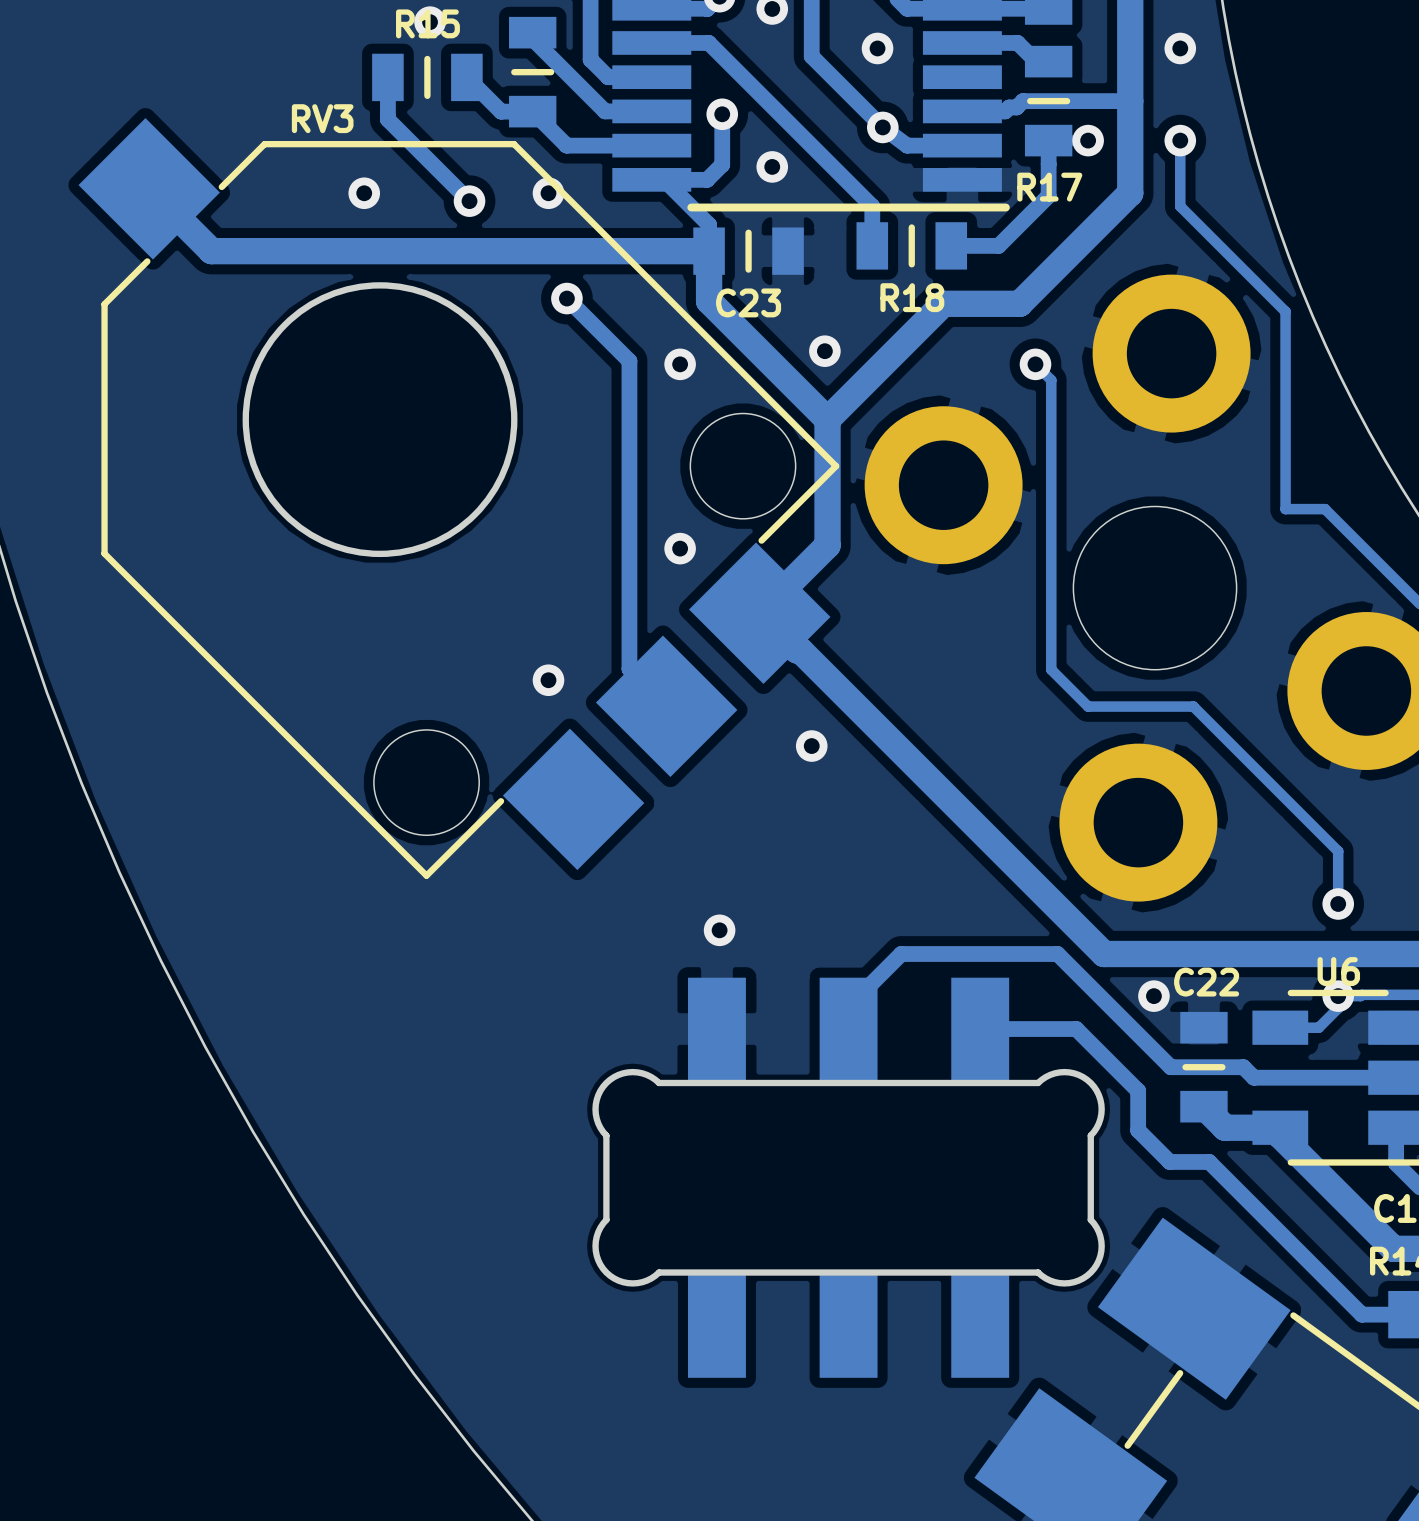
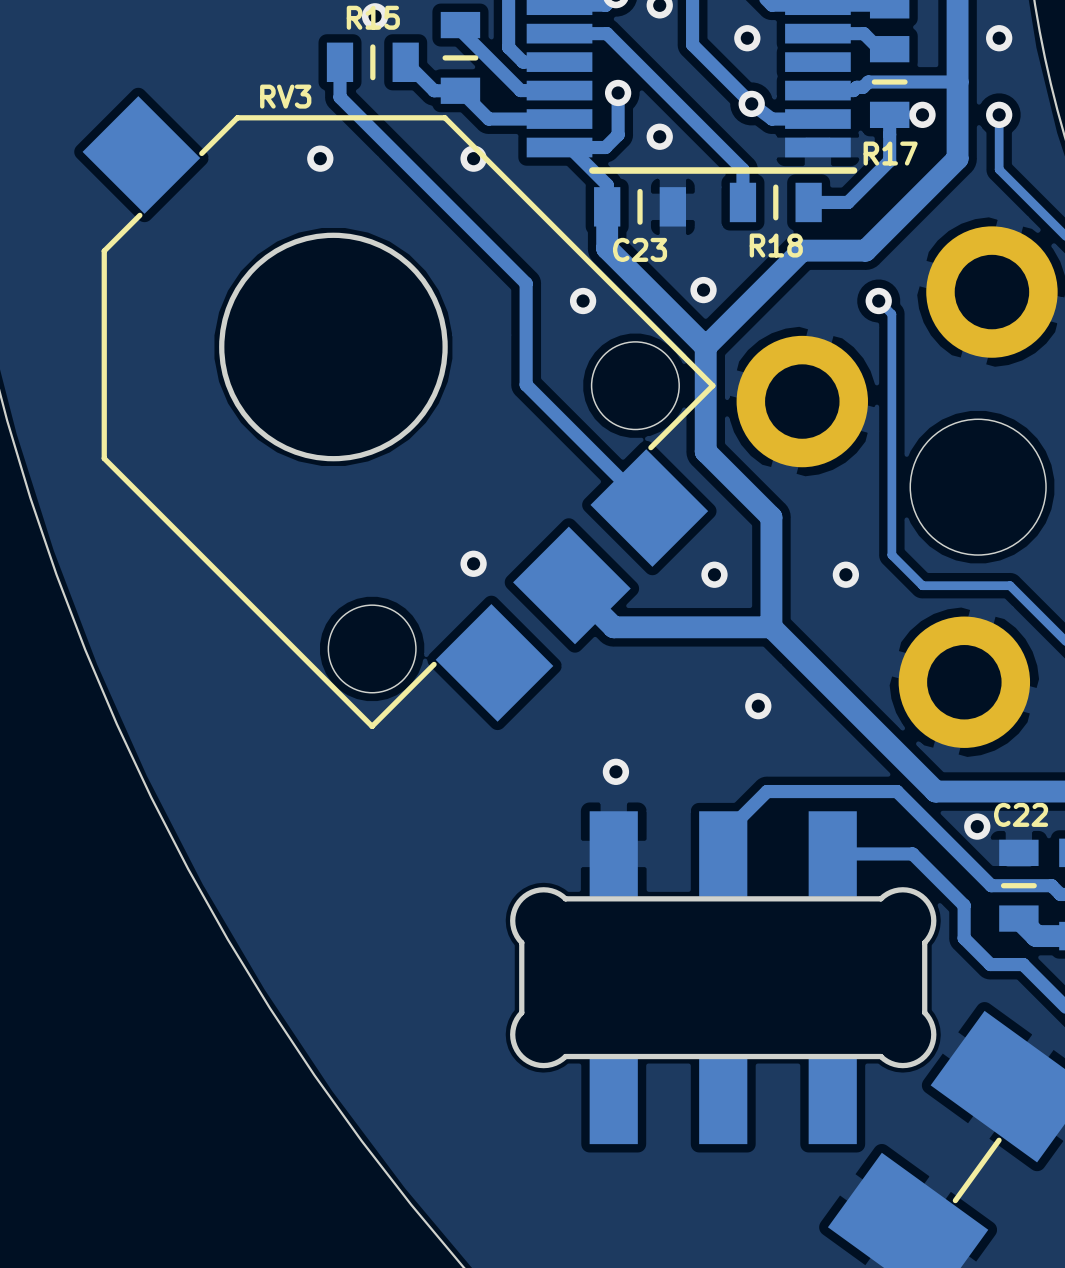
track: (149, 188) (211, 251) (709, 251) -> none
track: none -> (407, 165) (488, 246)
via: (469, 201) -> none
via: (566, 298) -> none
track: (611, 343) (629, 361) (629, 669) (666, 706) -> (526, 283) (526, 384) (649, 508)
track: (827, 545) (759, 613) (796, 650) (800, 650) (906, 756) -> (705, 451) (771, 517) (771, 627) (613, 627) (574, 587)
via: (680, 548) -> none
via: none -> (845, 574)
via position: (811, 746) -> (714, 574)
via: none -> (758, 706)

